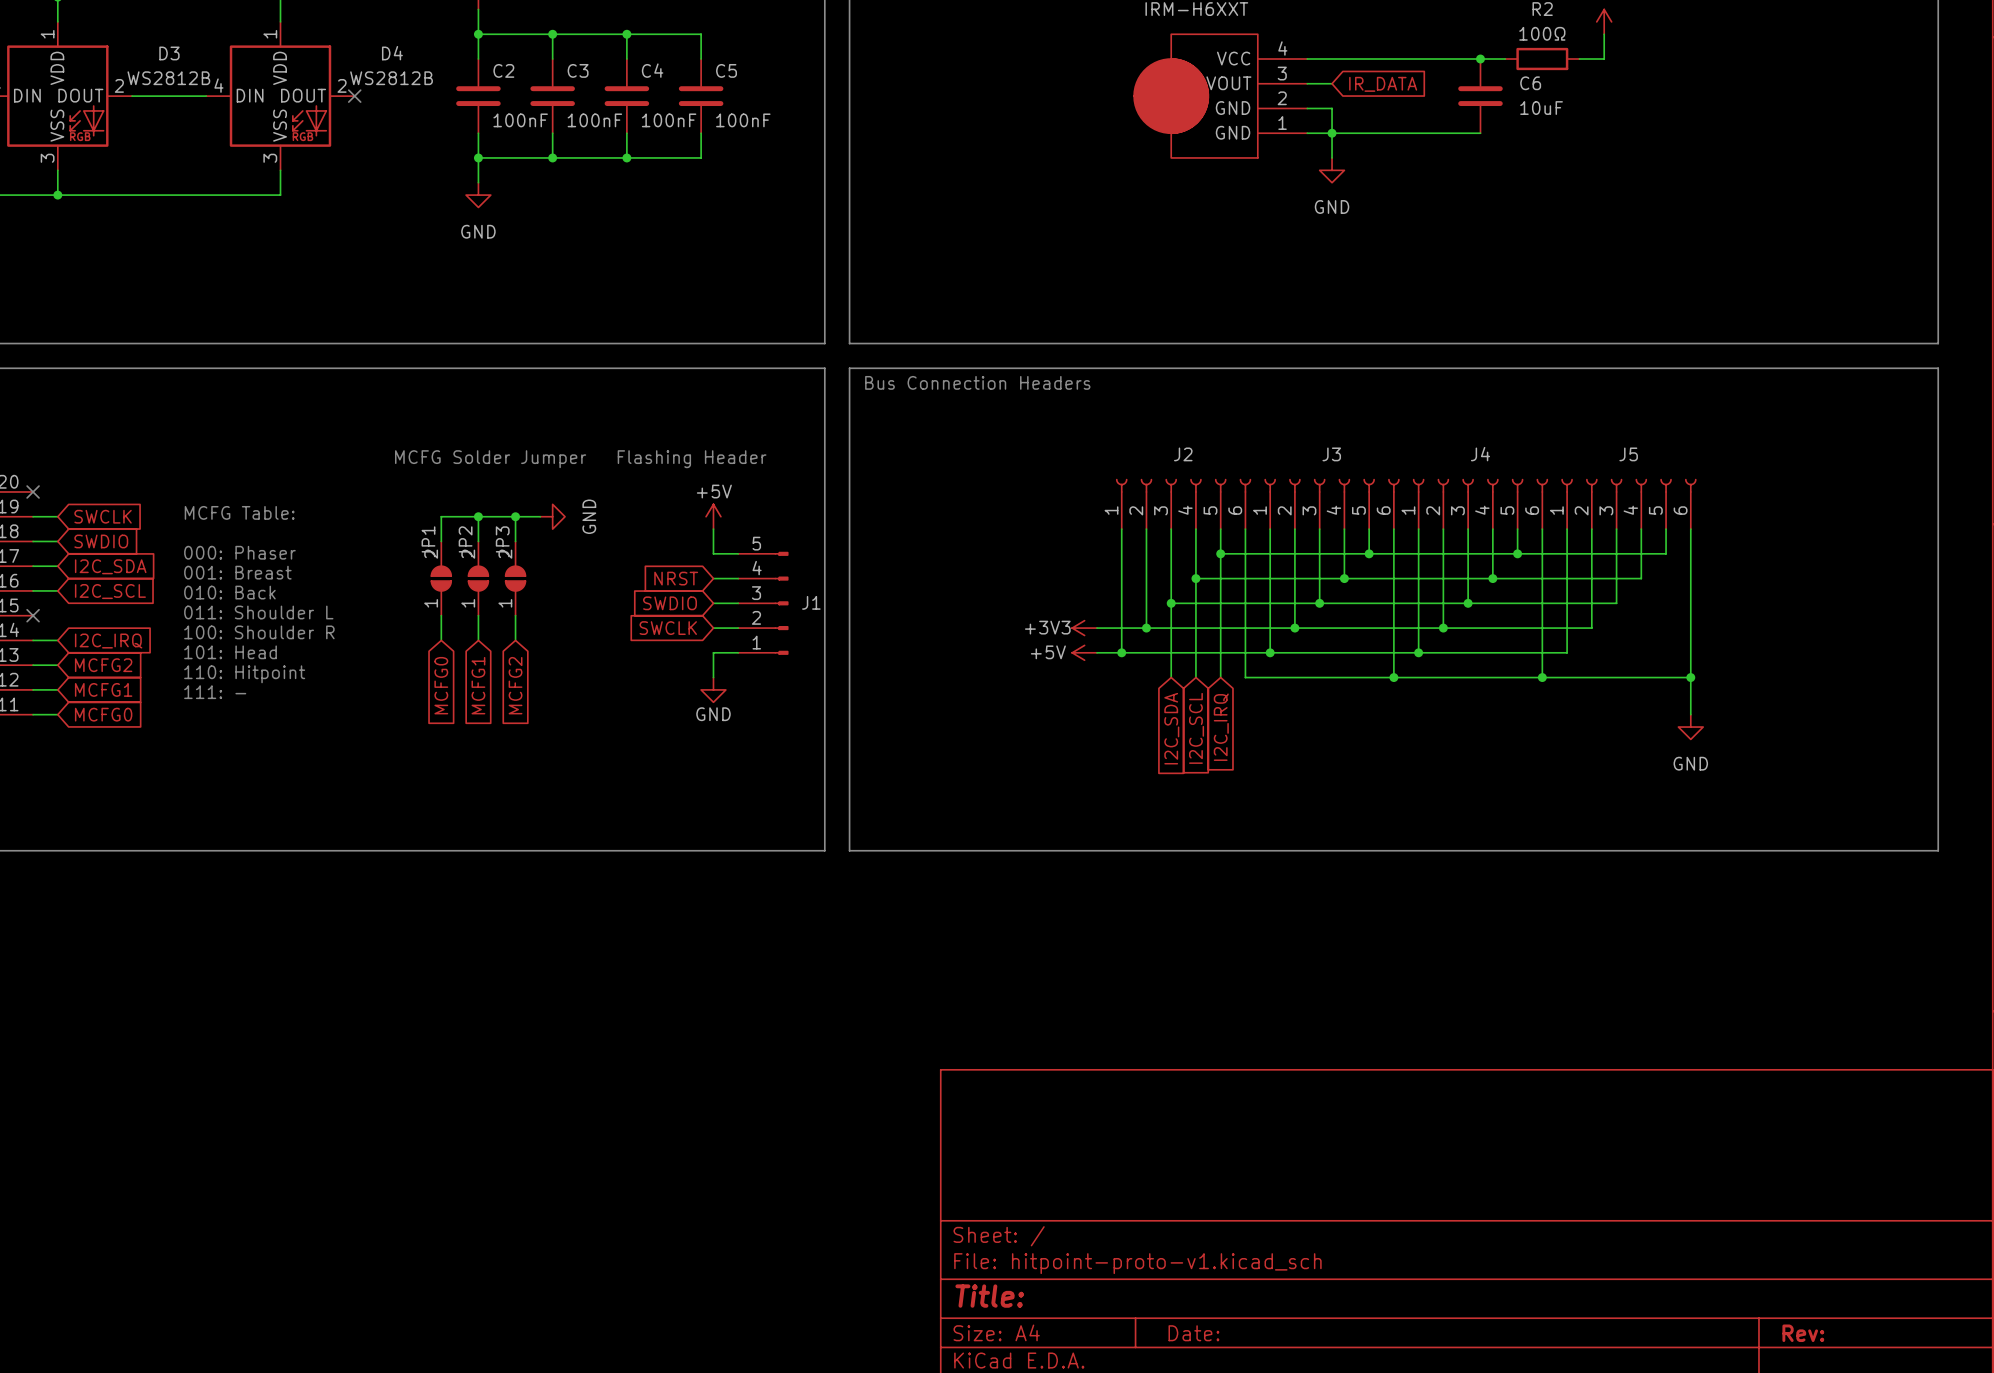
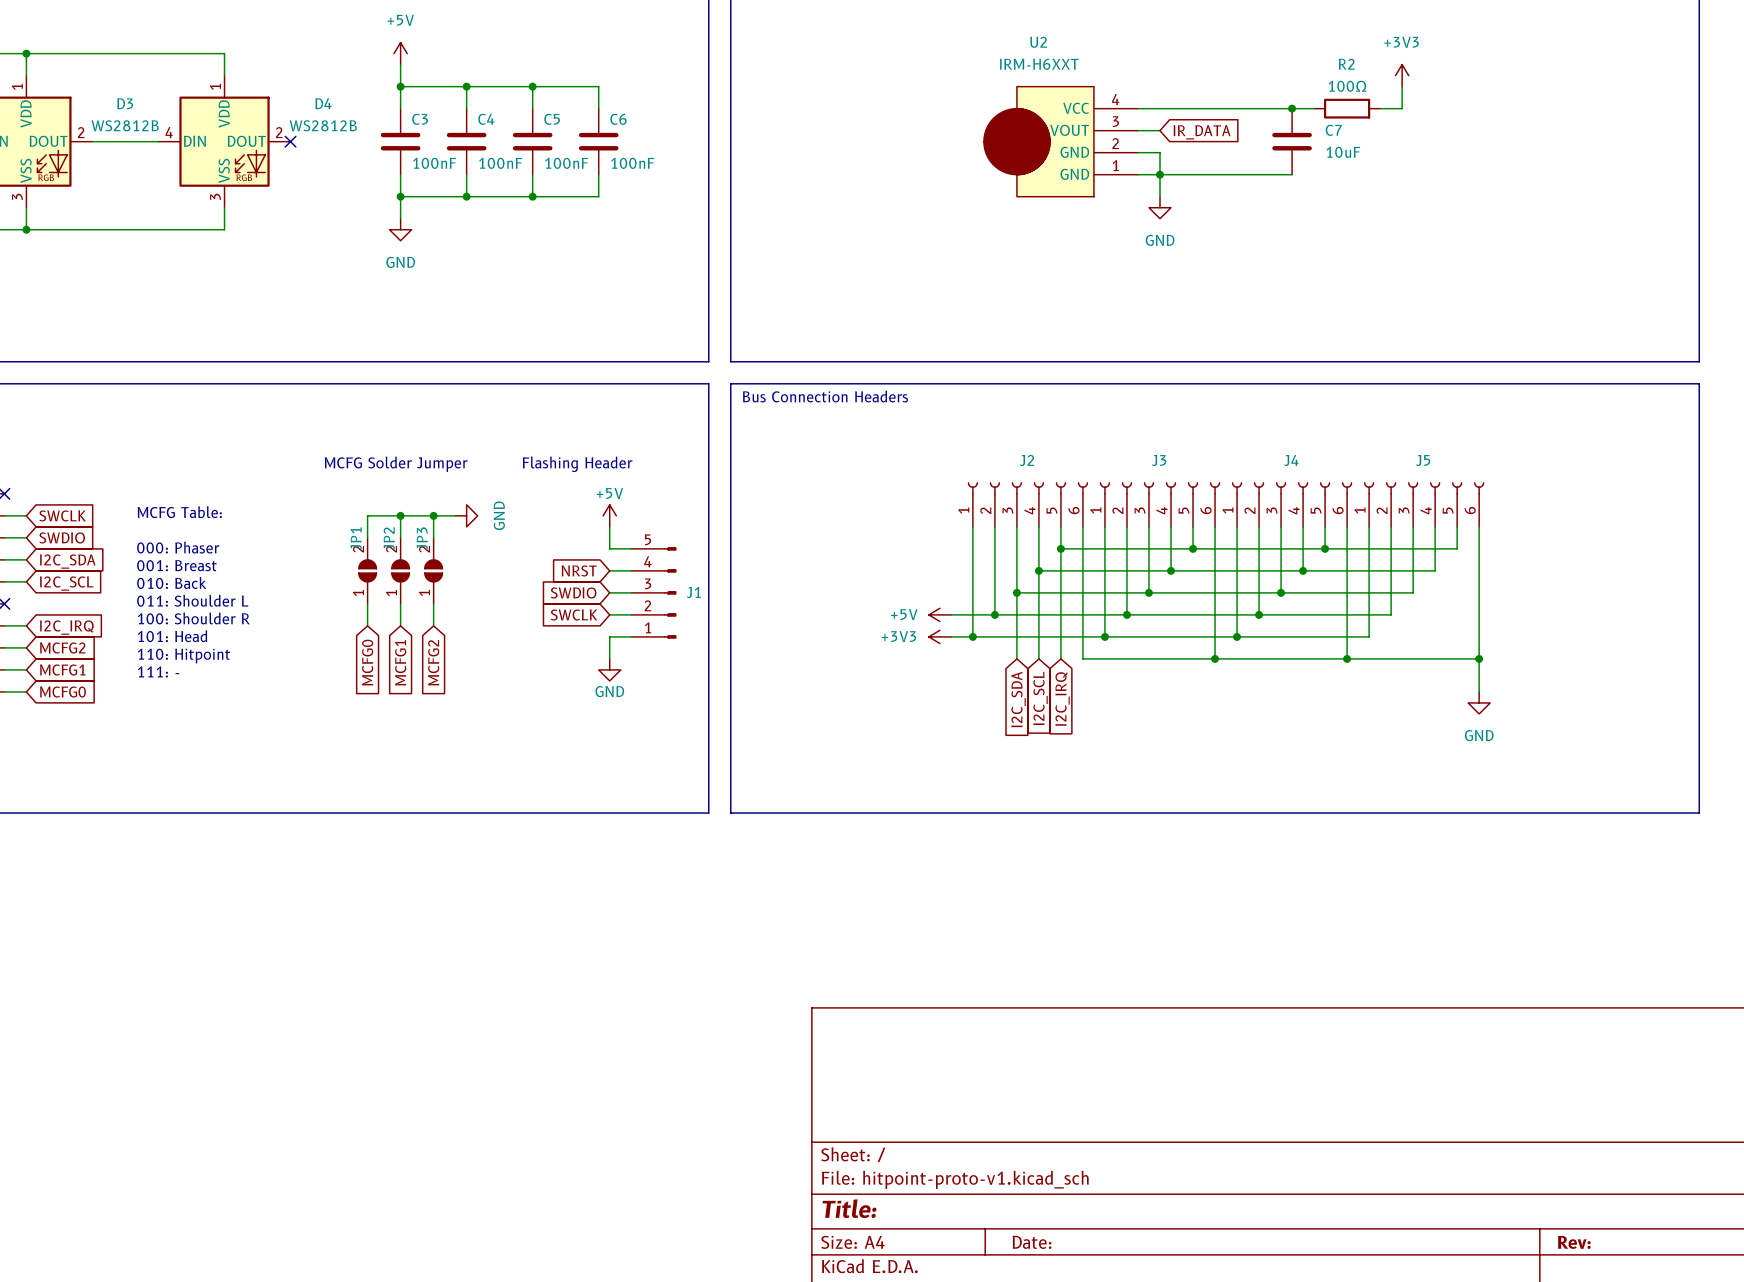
C2 name: C2 (503, 70) -> C3 (420, 119)
C3 name: C3 (578, 70) -> C4 (486, 119)
C4 name: C4 (652, 70) -> C5 (552, 119)
C5 name: C5 (726, 70) -> C6 (618, 119)
C6 name: C6 (1530, 83) -> C7 (1333, 130)
power symbol: +3V3 (1084, 628) -> +5V (939, 614)
power symbol: +5V (1084, 652) -> +3V3 (939, 636)

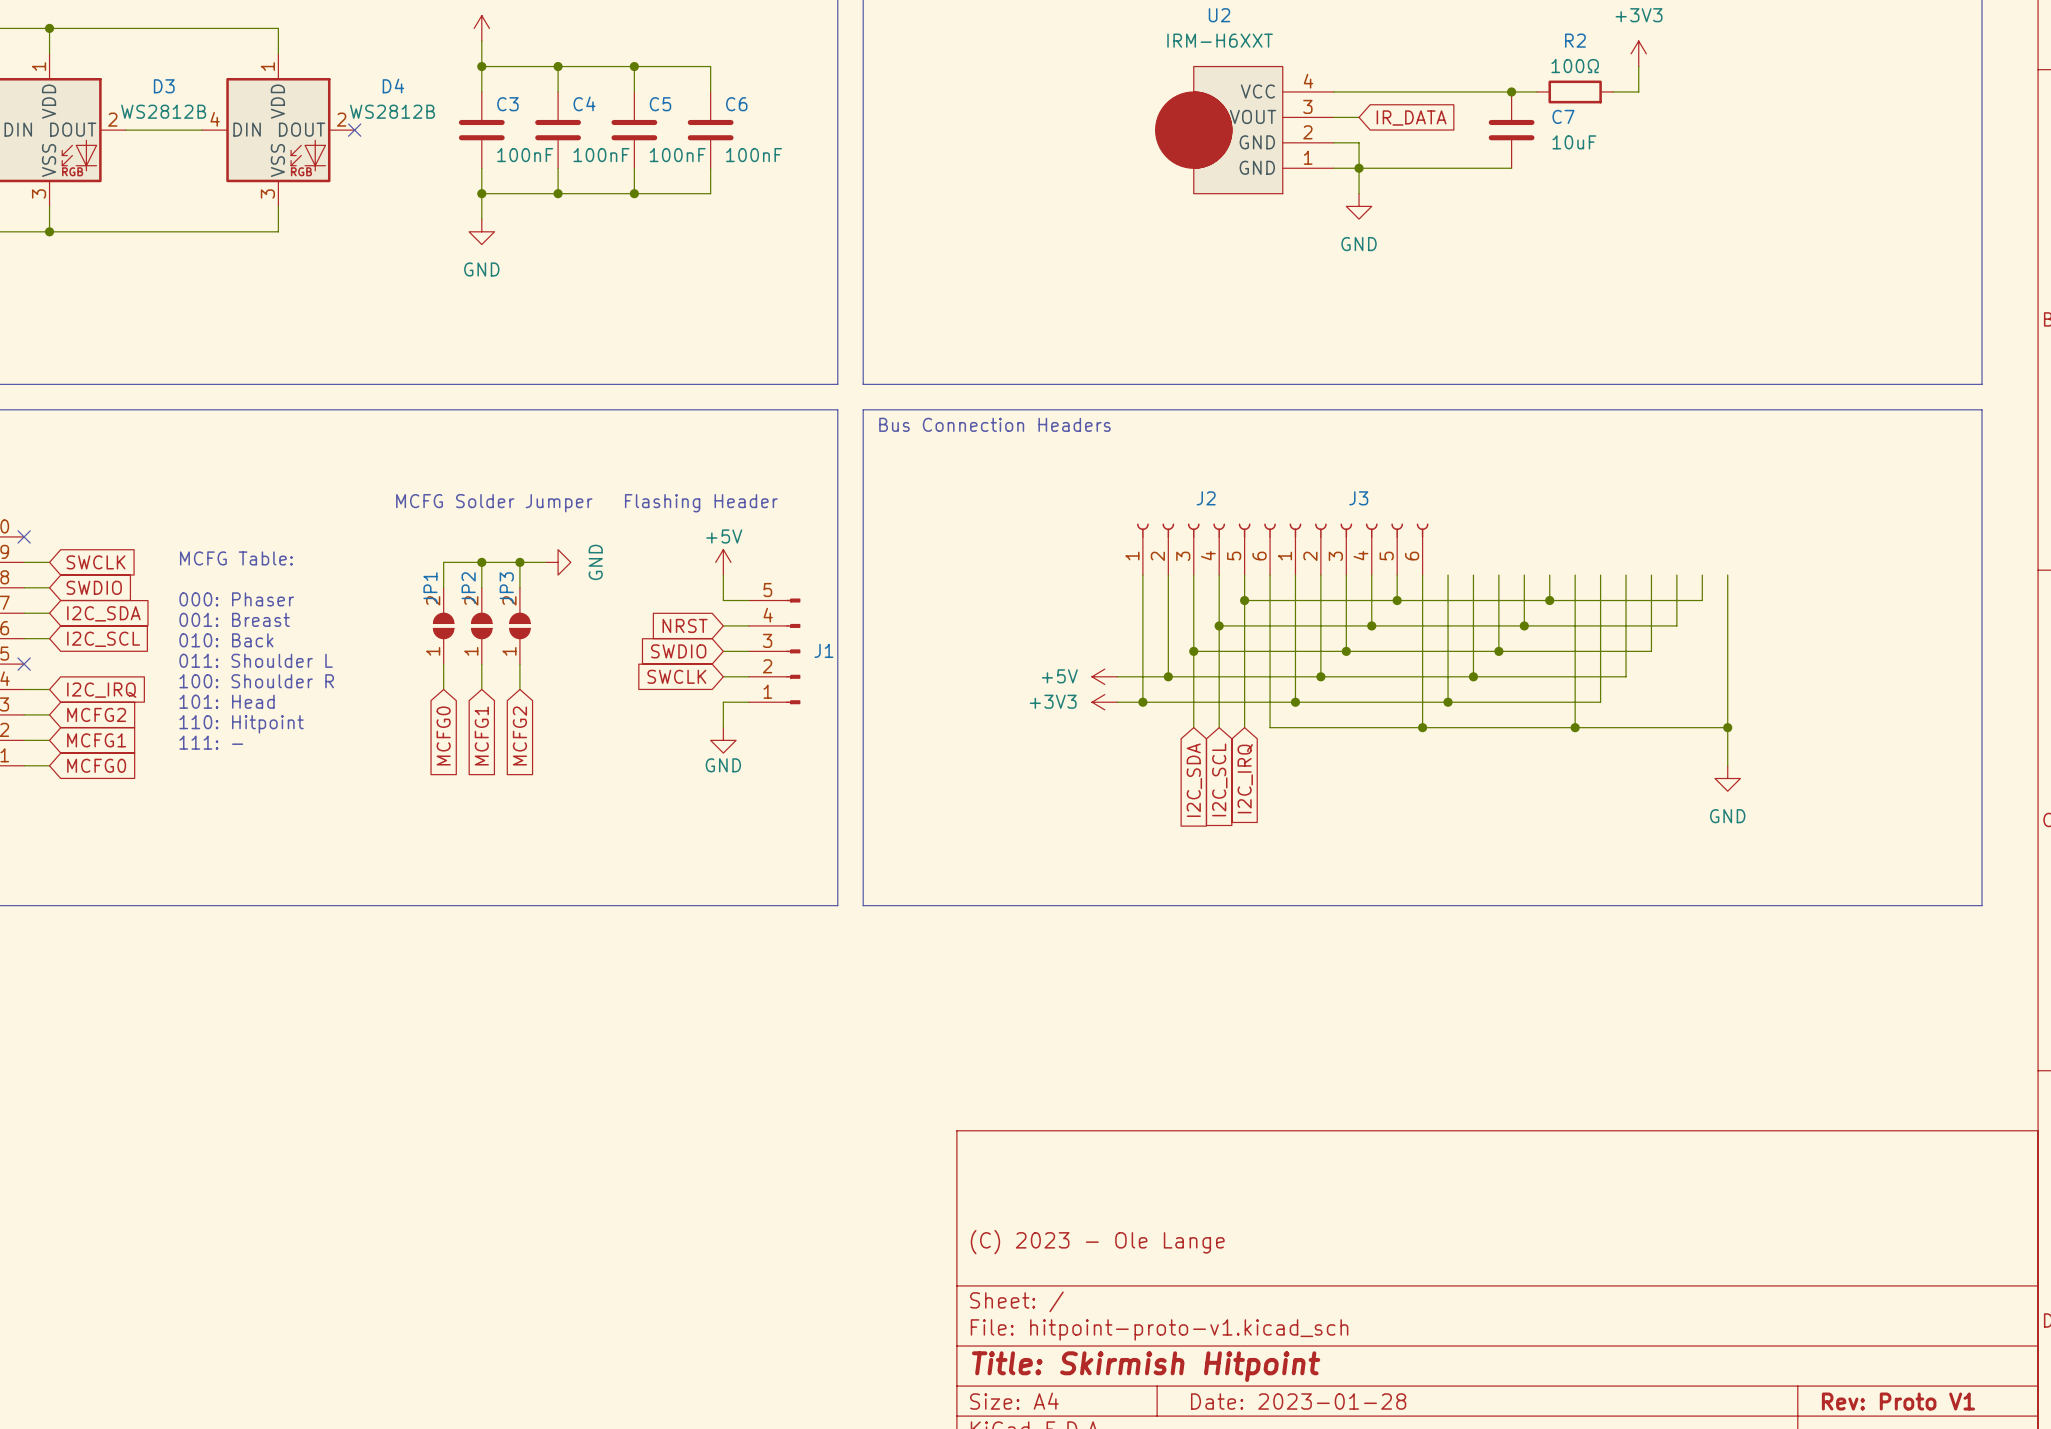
J4: (1292, 504) -> none
J5: (1424, 504) -> none
title block: none -> (C) 2023 - Ole Lange (1097, 1242)
title block: Title: (849, 1208) -> Title: Skirmish Hitpoint (1146, 1366)
title block: Date: (1032, 1242) -> Date: 2023-01-28 (1298, 1401)
title block: Rev: (1574, 1242) -> Rev: Proto V1 (1898, 1401)

